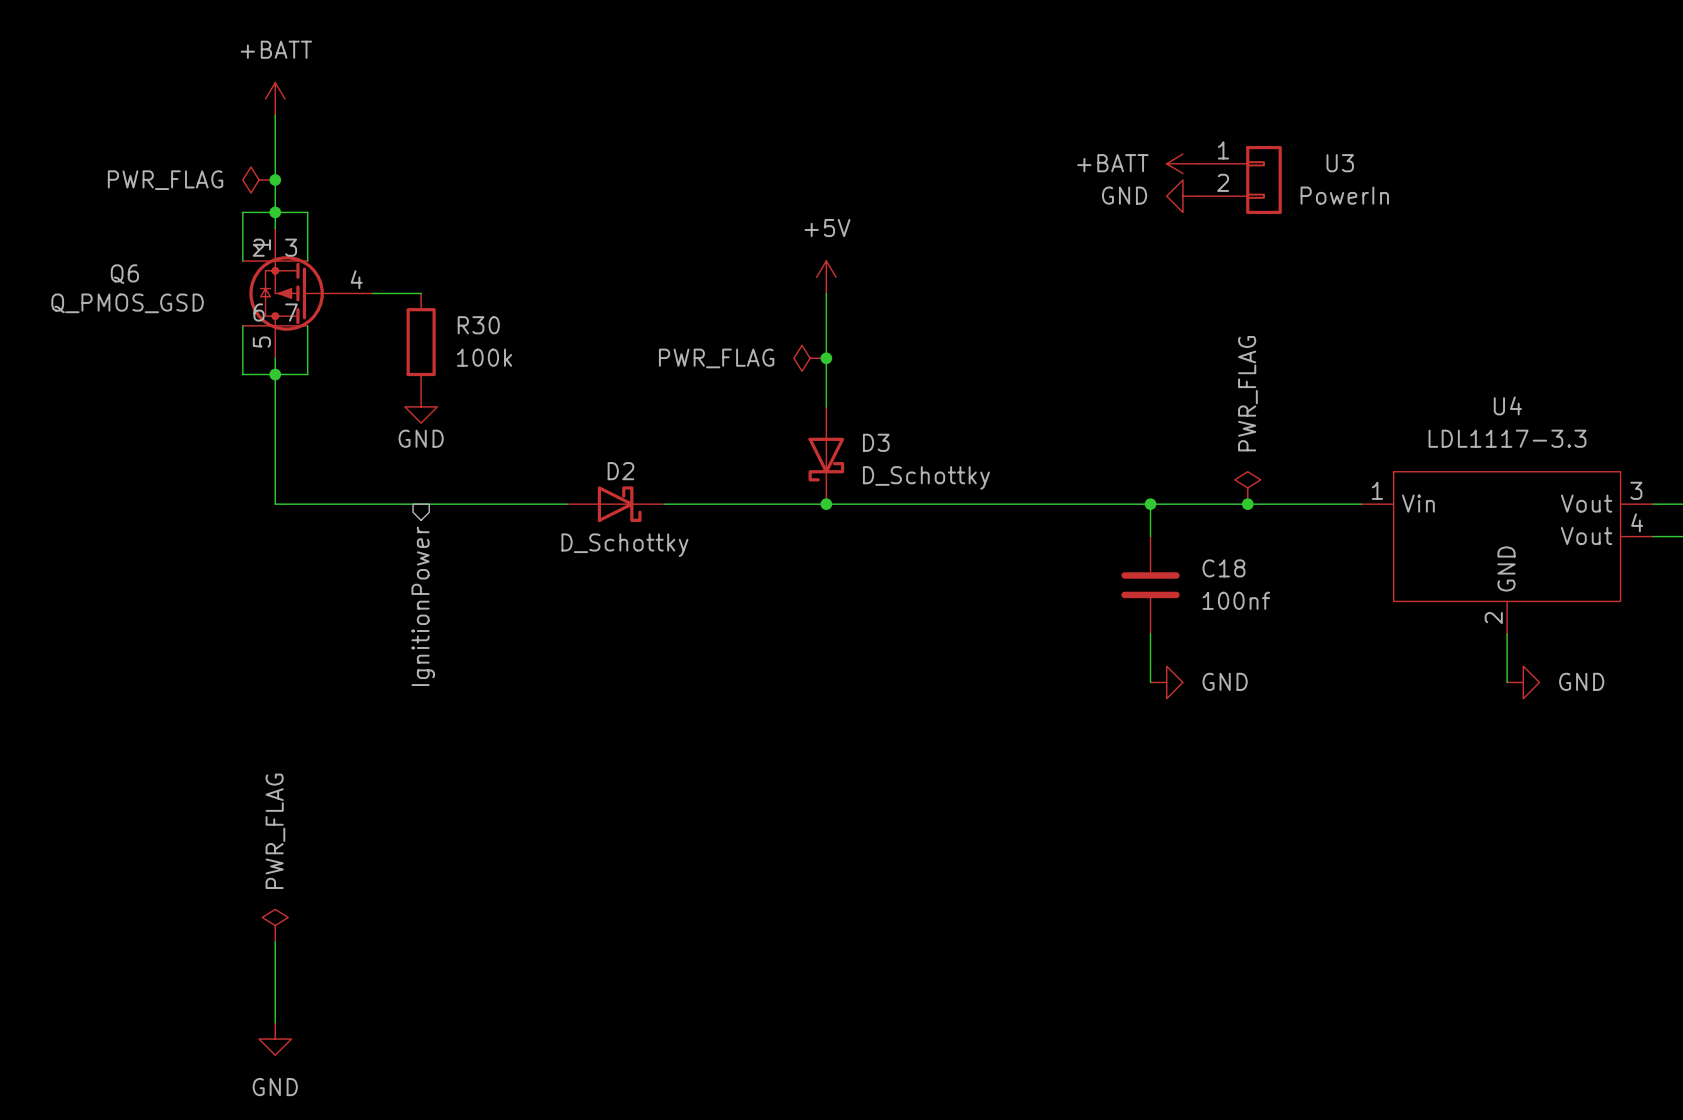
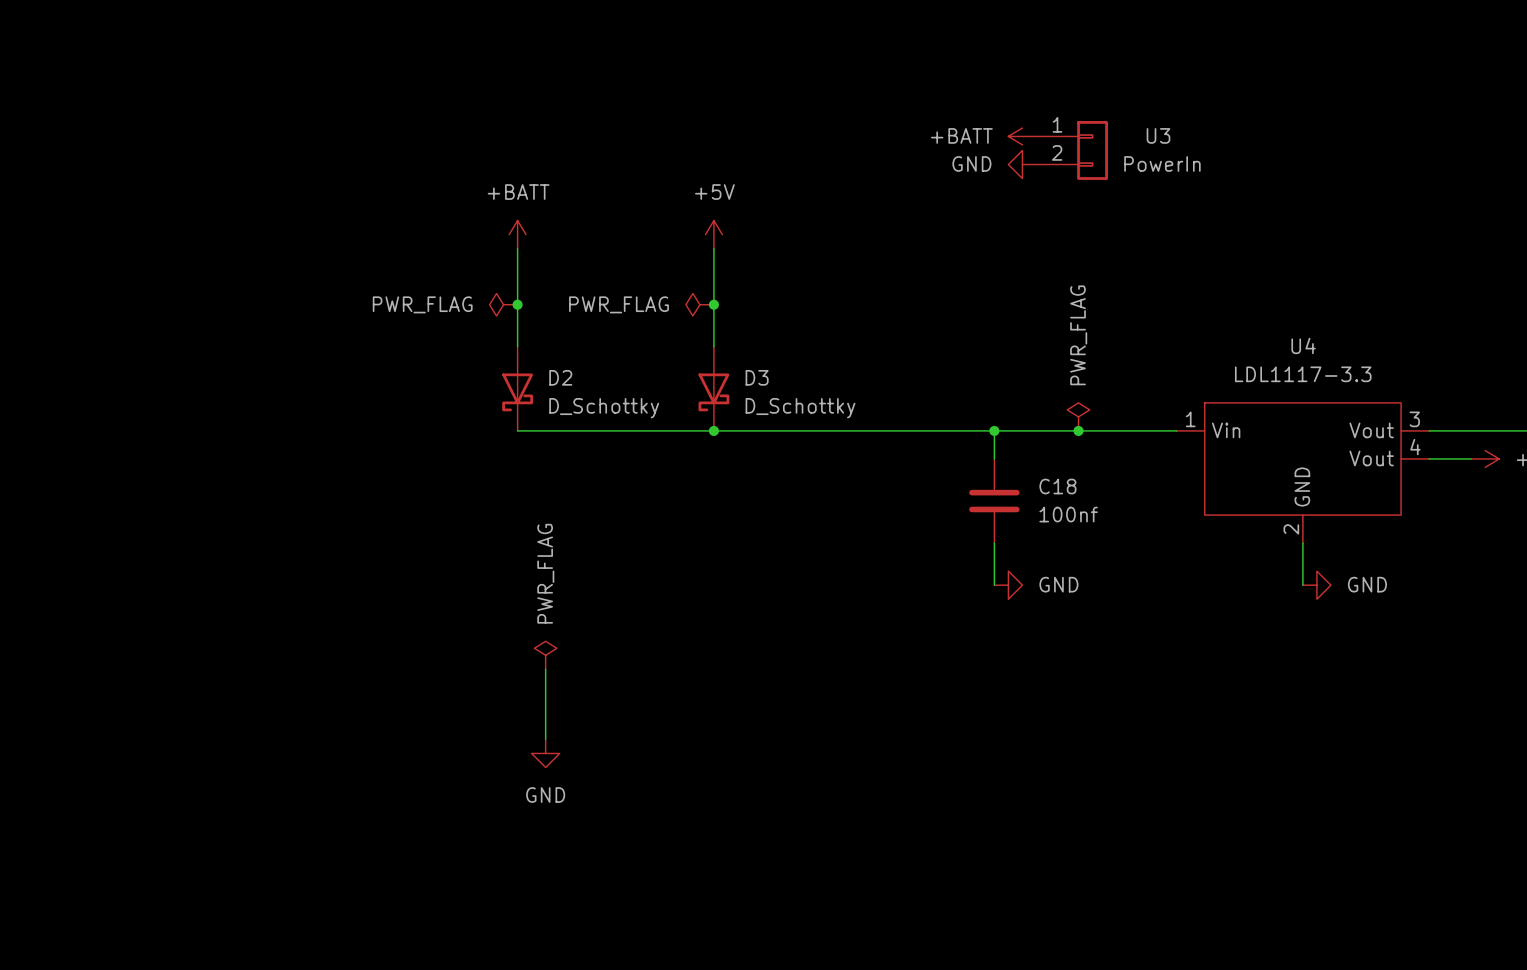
power symbol: +BATT (275, 98) -> none
wire: (275, 115) (275, 228) -> none
power symbol: PWR_FLAG (259, 180) -> none
junction: (275, 180) -> none
junction: (275, 212) -> none
wire: (242, 261) (242, 212) (307, 212) (307, 261) -> none
power symbol: none -> +BATT (517, 234)
Q6: Q_PMOS_GSD (307, 293) -> none
wire: (372, 293) (421, 293) -> none
wire: none -> (517, 248) (517, 346)
wire: (242, 325) (242, 374) (307, 374) (307, 325) -> none
R30: 100k (421, 342) -> none
wire: (275, 358) (275, 504) (567, 504) -> none
power symbol: none -> PWR_FLAG (503, 304)
junction: none -> (517, 304)
junction: (275, 374) -> none
power symbol: GND (421, 406) -> none
D2 name position: D2 (620, 471) -> D2 (560, 377)
D2 rotation: 0° (619, 504) -> 90° clockwise (517, 392)
D2 value position: D_Schottky (624, 545) -> D_Schottky (604, 408)
hierarchical label: IgnitionPower (423, 606) -> none
power symbol: none -> PWR_FLAG (545, 655)
wire: none -> (545, 669) (545, 739)
power symbol: none -> GND (545, 753)
power symbol: PWR_FLAG (275, 925) -> none
wire: (275, 941) (275, 1022) -> none
power symbol: GND (275, 1039) -> none

